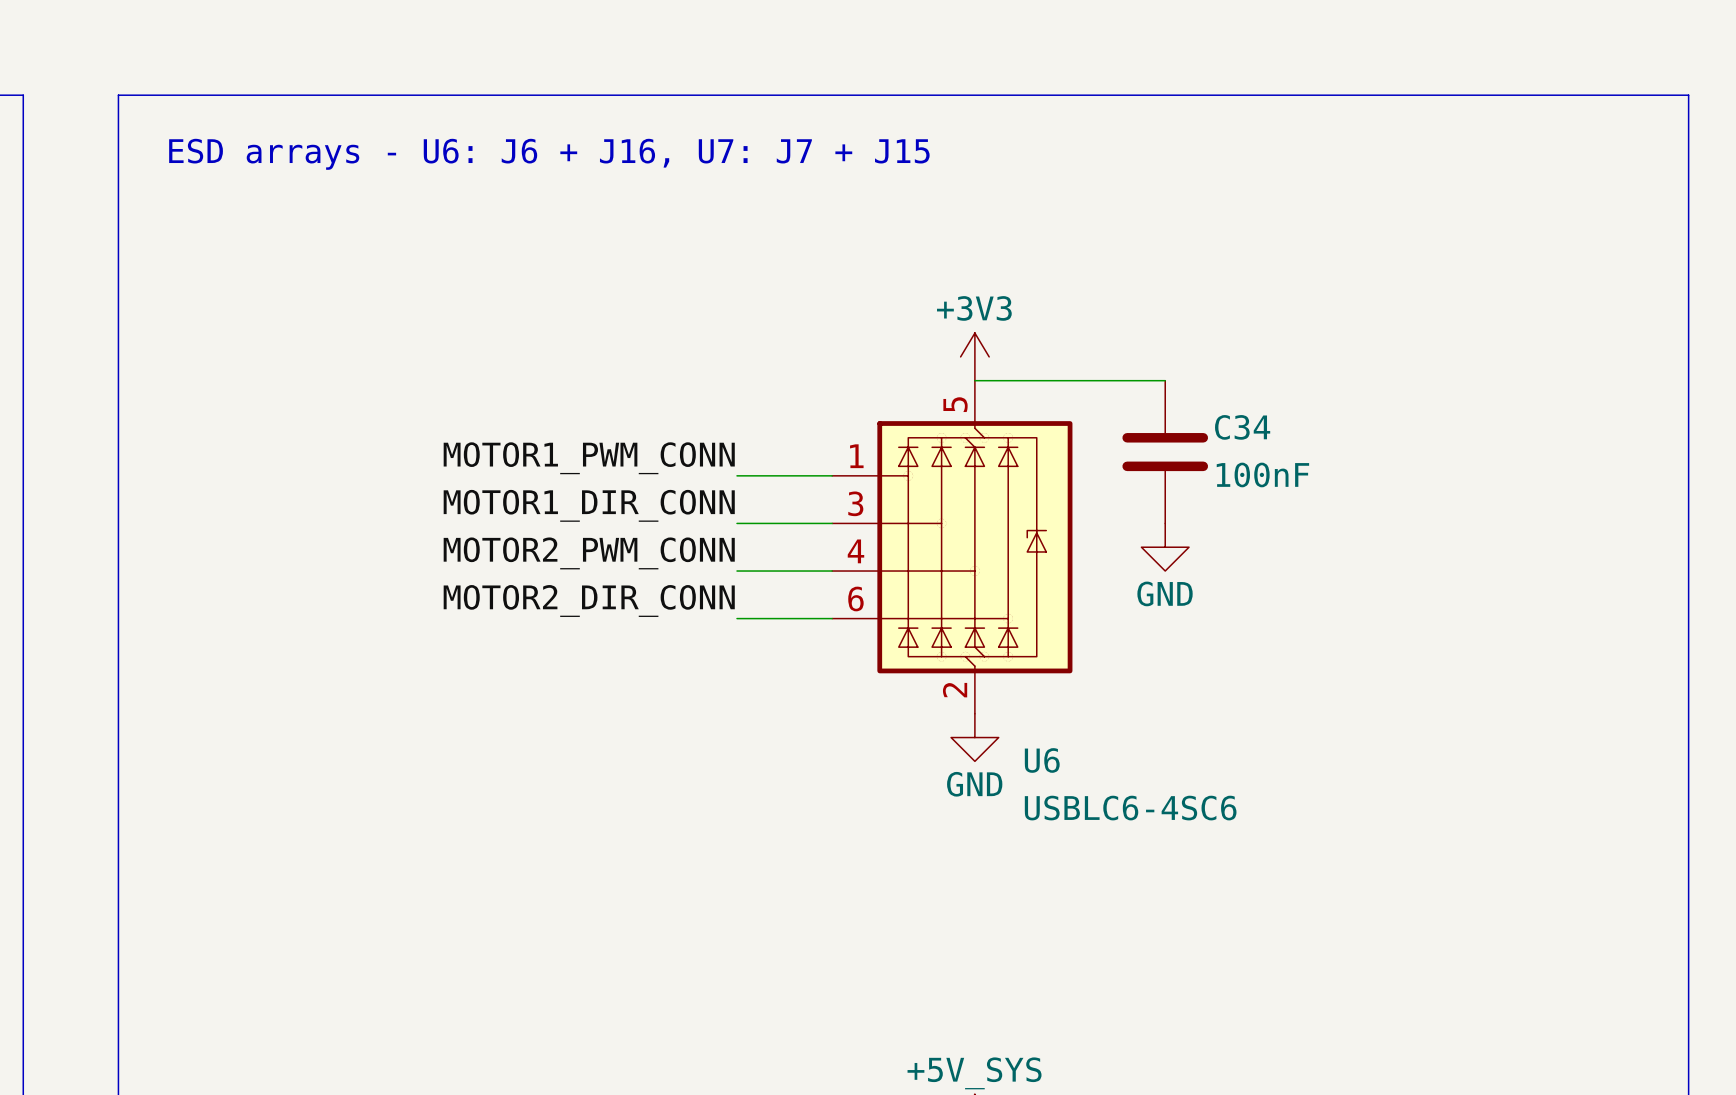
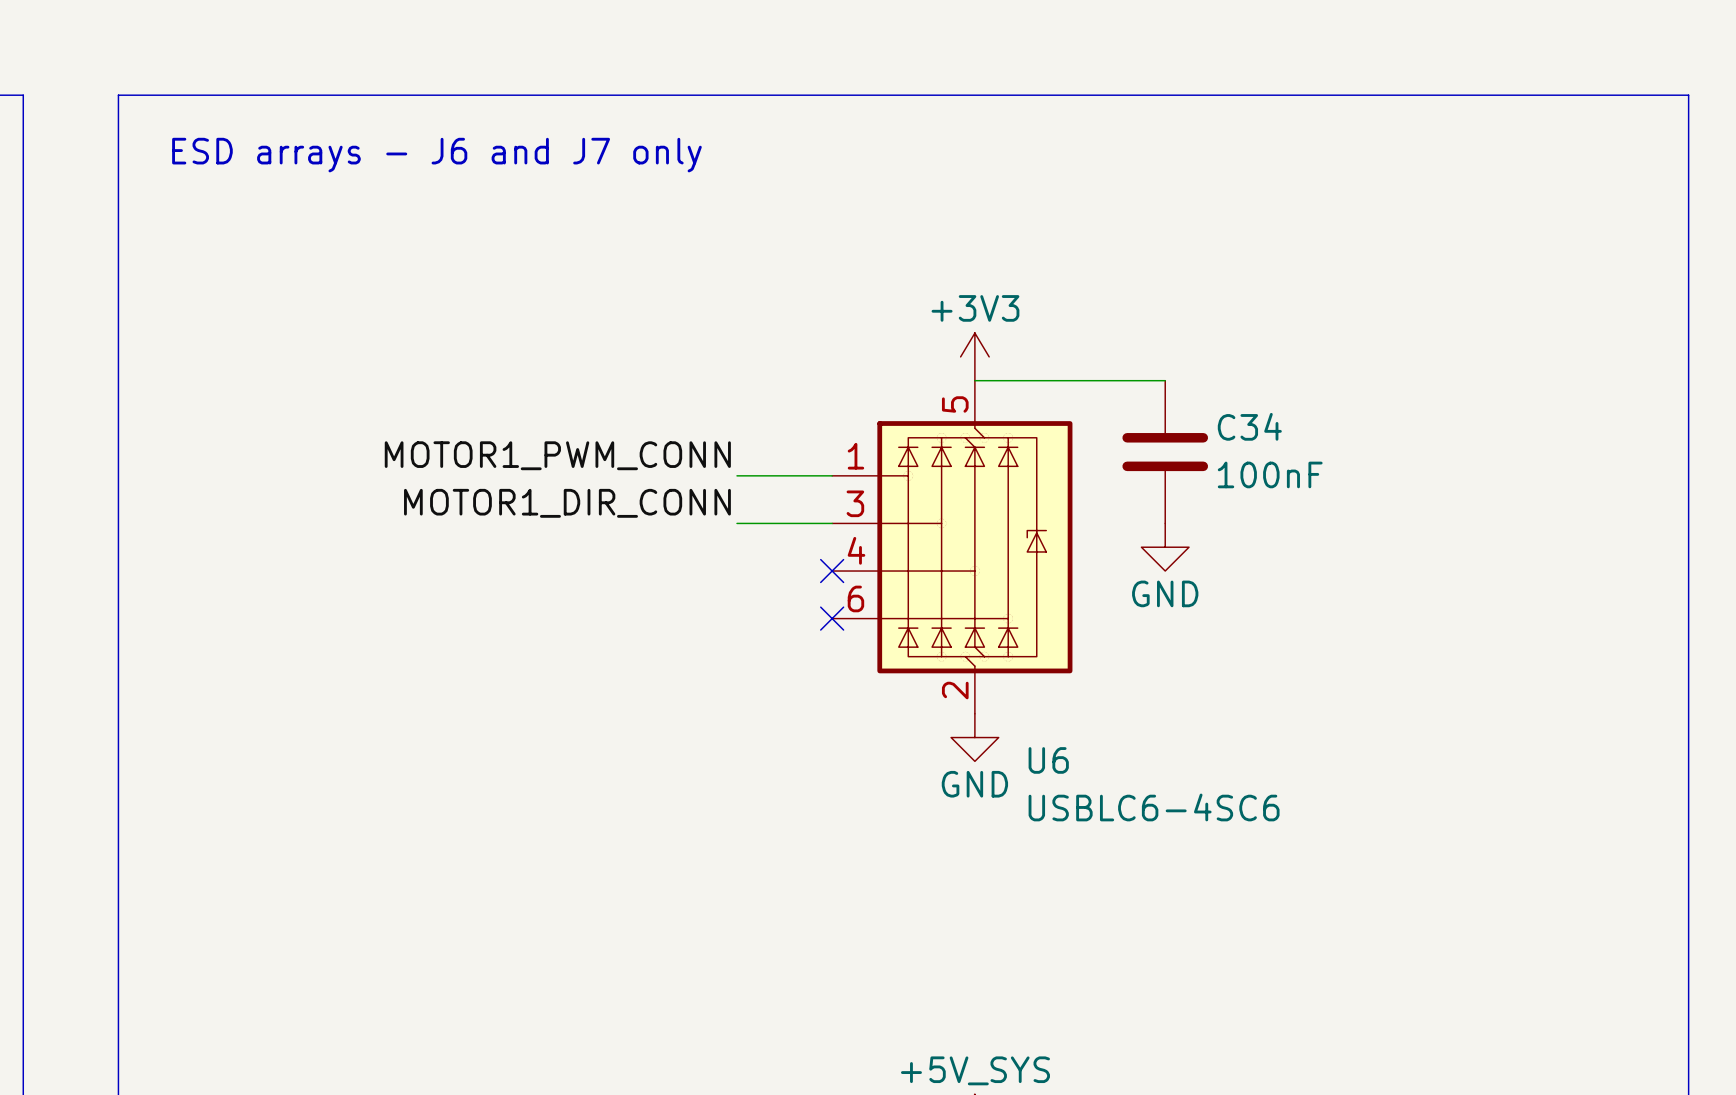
text: ESD arrays - U6: J6 + J16, U7: J7 + J15 (549, 154) -> ESD arrays - J6 and J7 only (436, 155)
label: MOTOR2_PWM_CONN (589, 553) -> none
wire: (736, 571) (832, 571) -> none
no-connect mark: none -> (832, 571)
label: MOTOR2_DIR_CONN (589, 601) -> none
wire: (736, 618) (832, 618) -> none
no-connect mark: none -> (832, 618)

